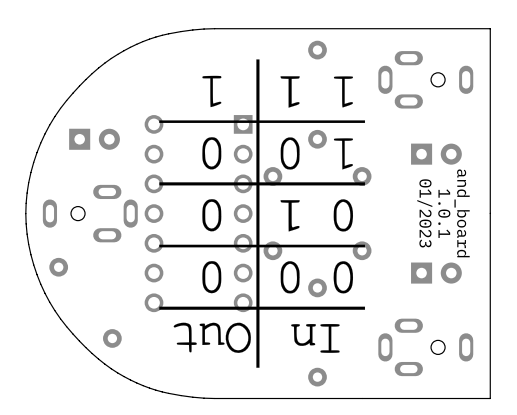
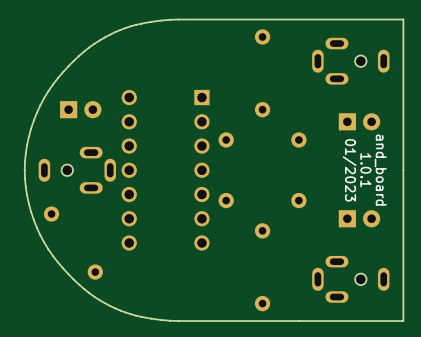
drawing: [159, 59, 366, 368] -> none

